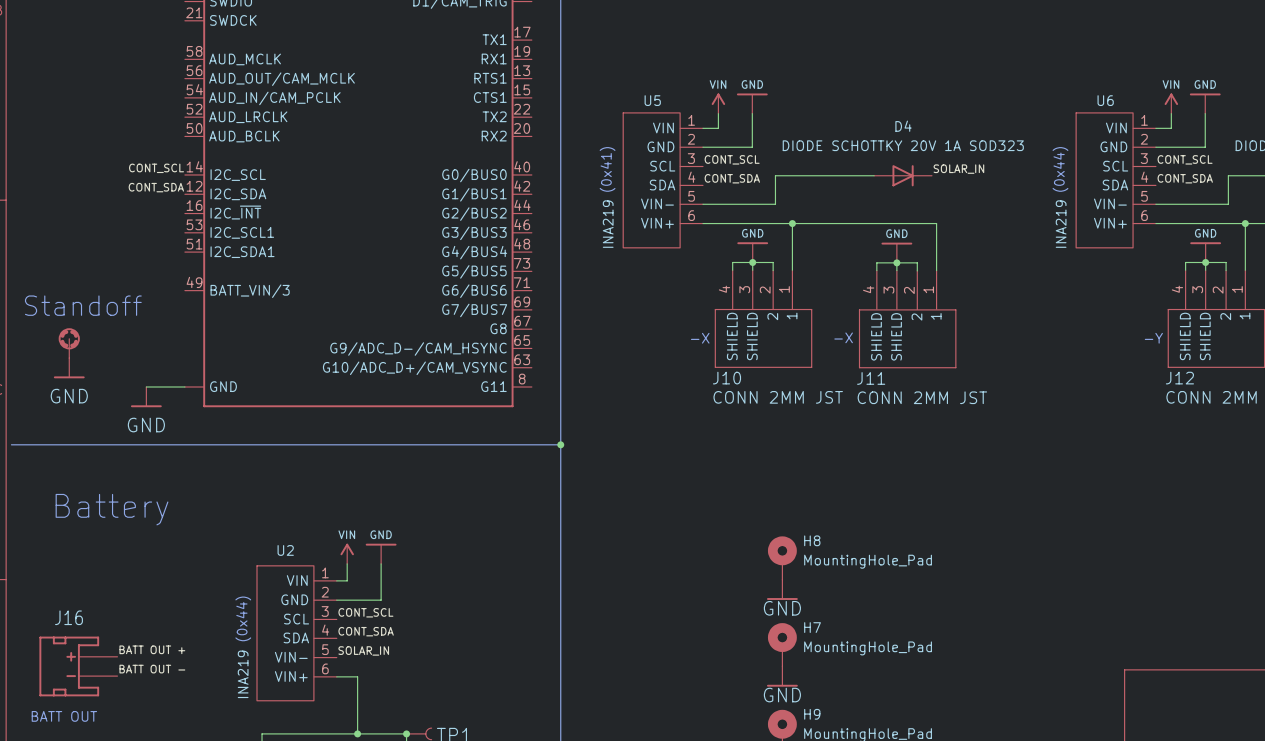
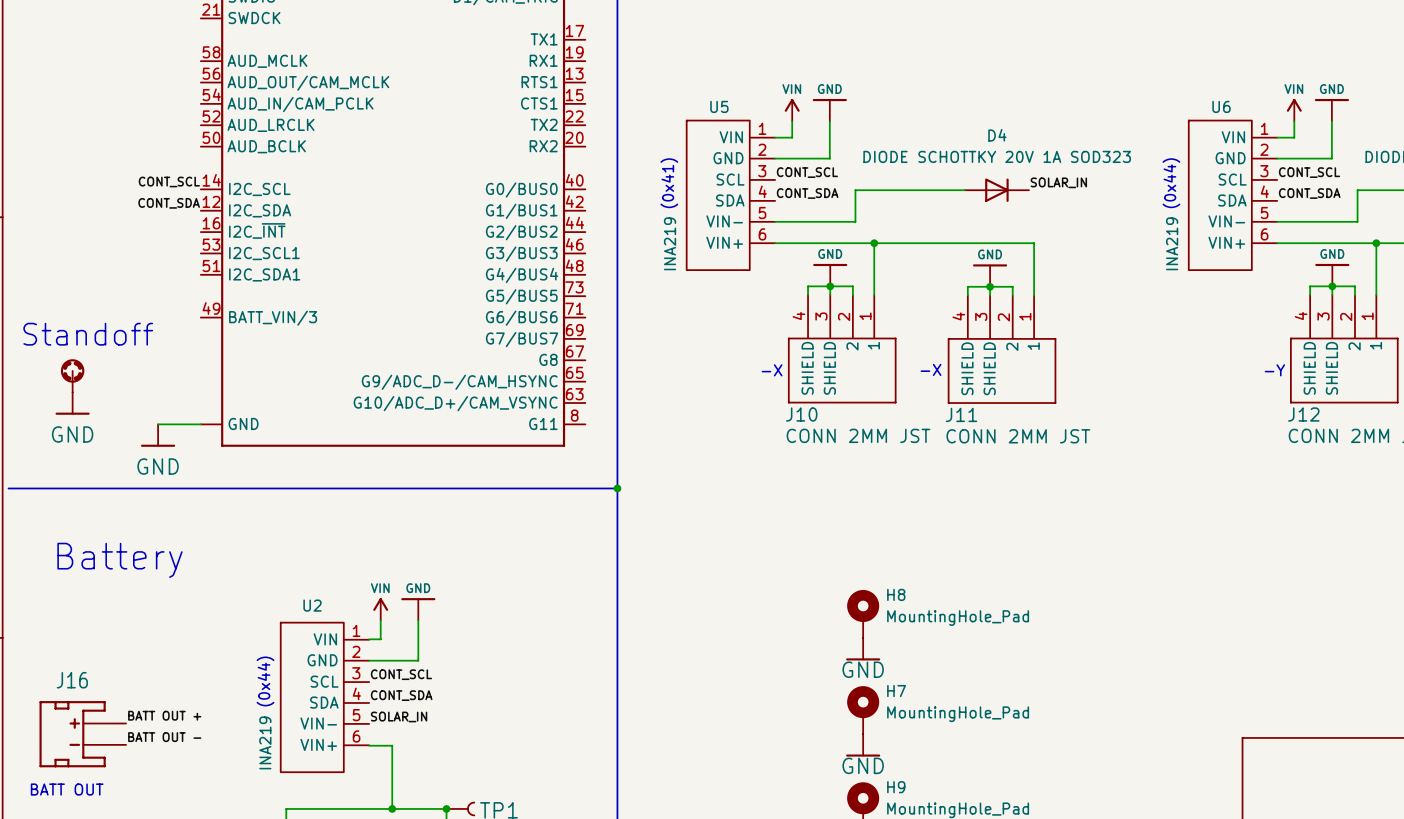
U2 symbol: [257, 565, 337, 701] -> [280, 622, 370, 773]

